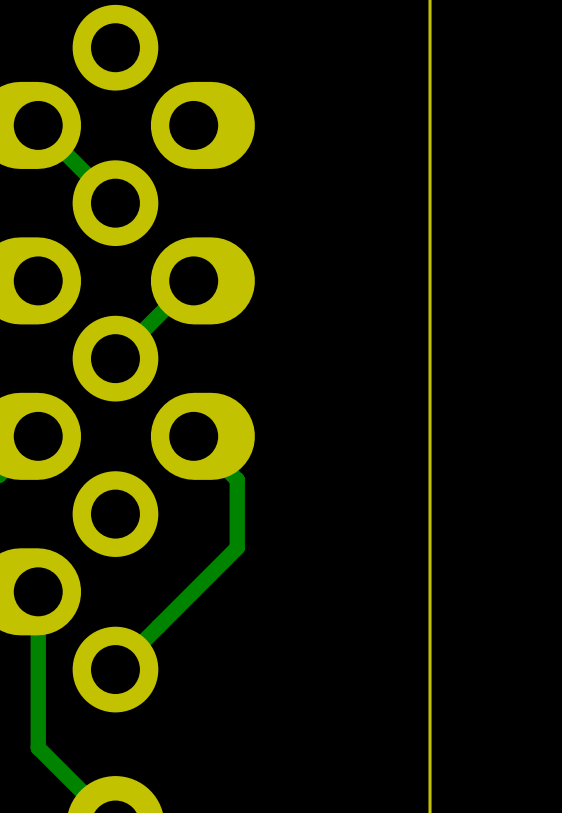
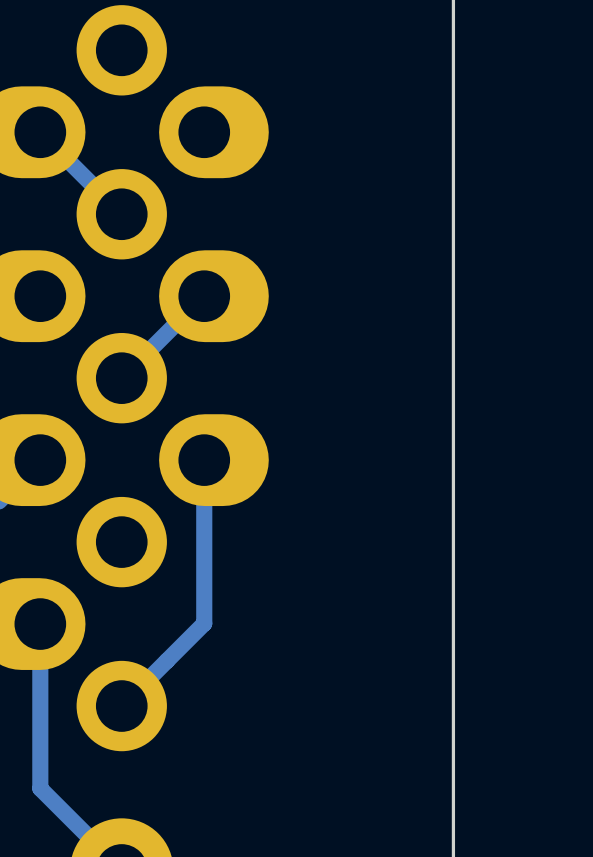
track: (193, 436) (237, 479) (237, 547) (193, 591) -> (204, 460) (204, 623)

